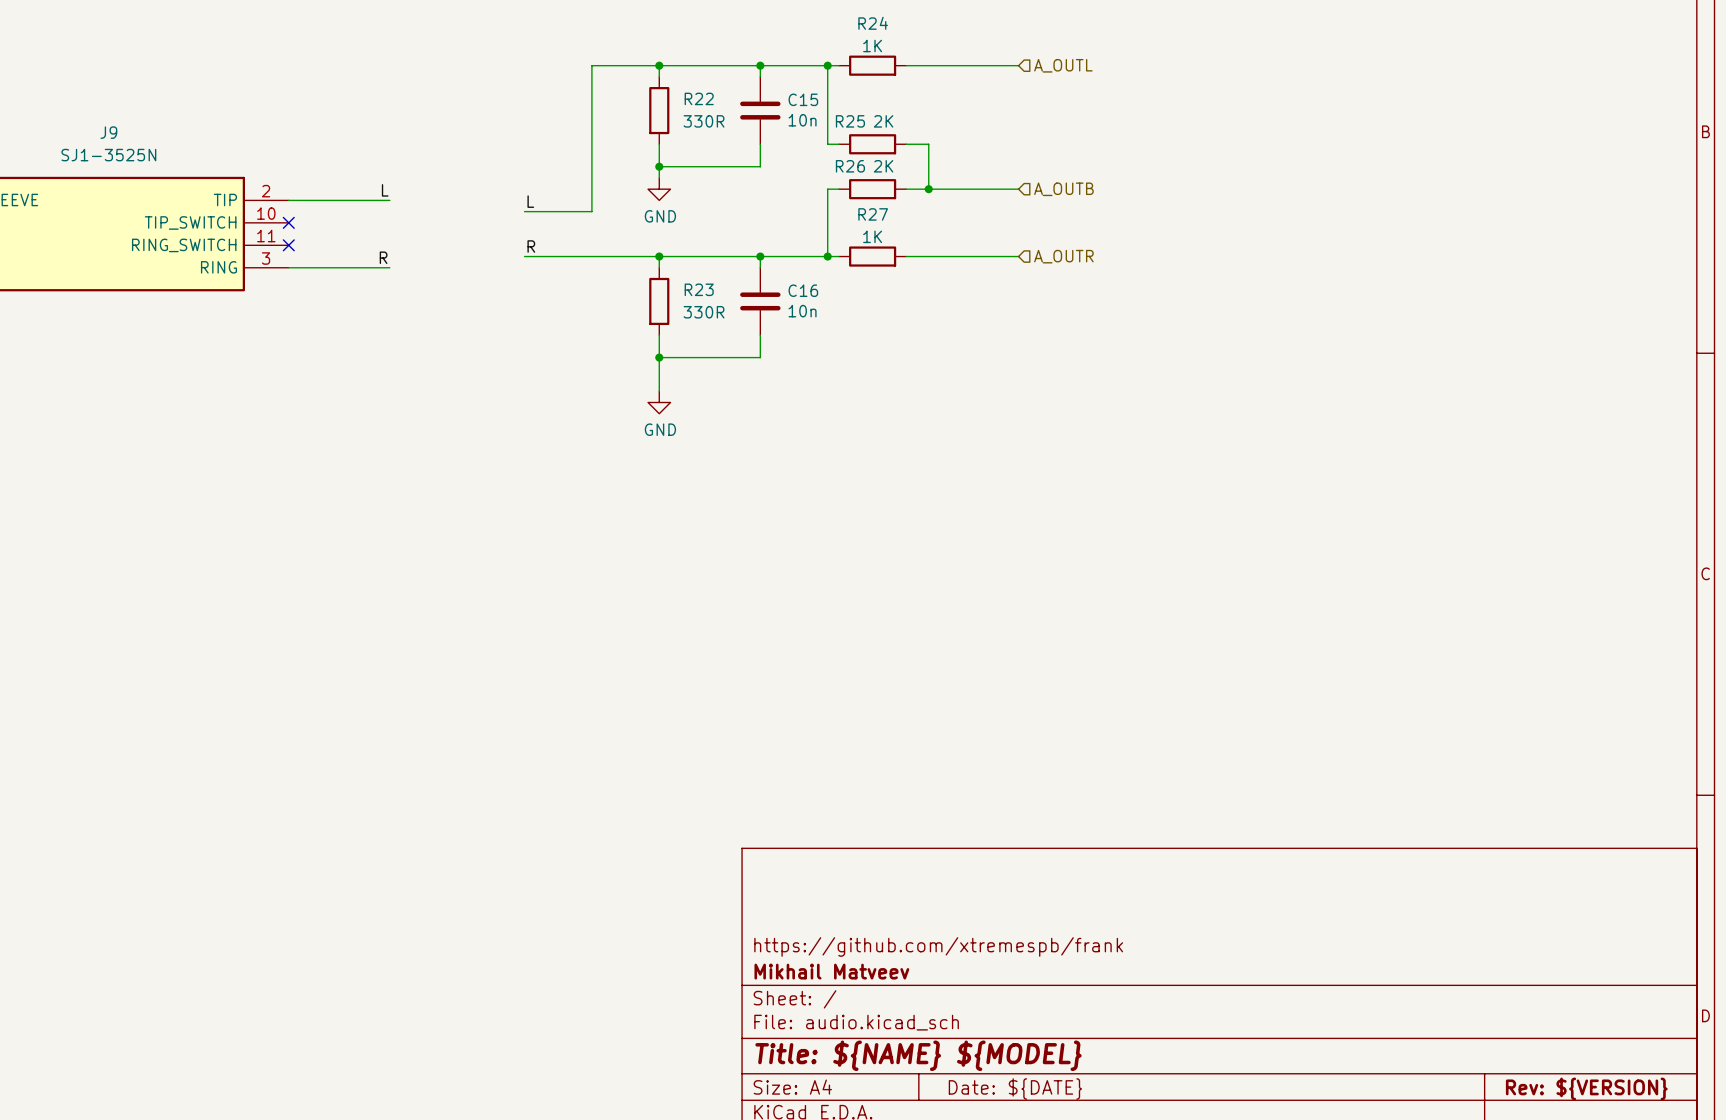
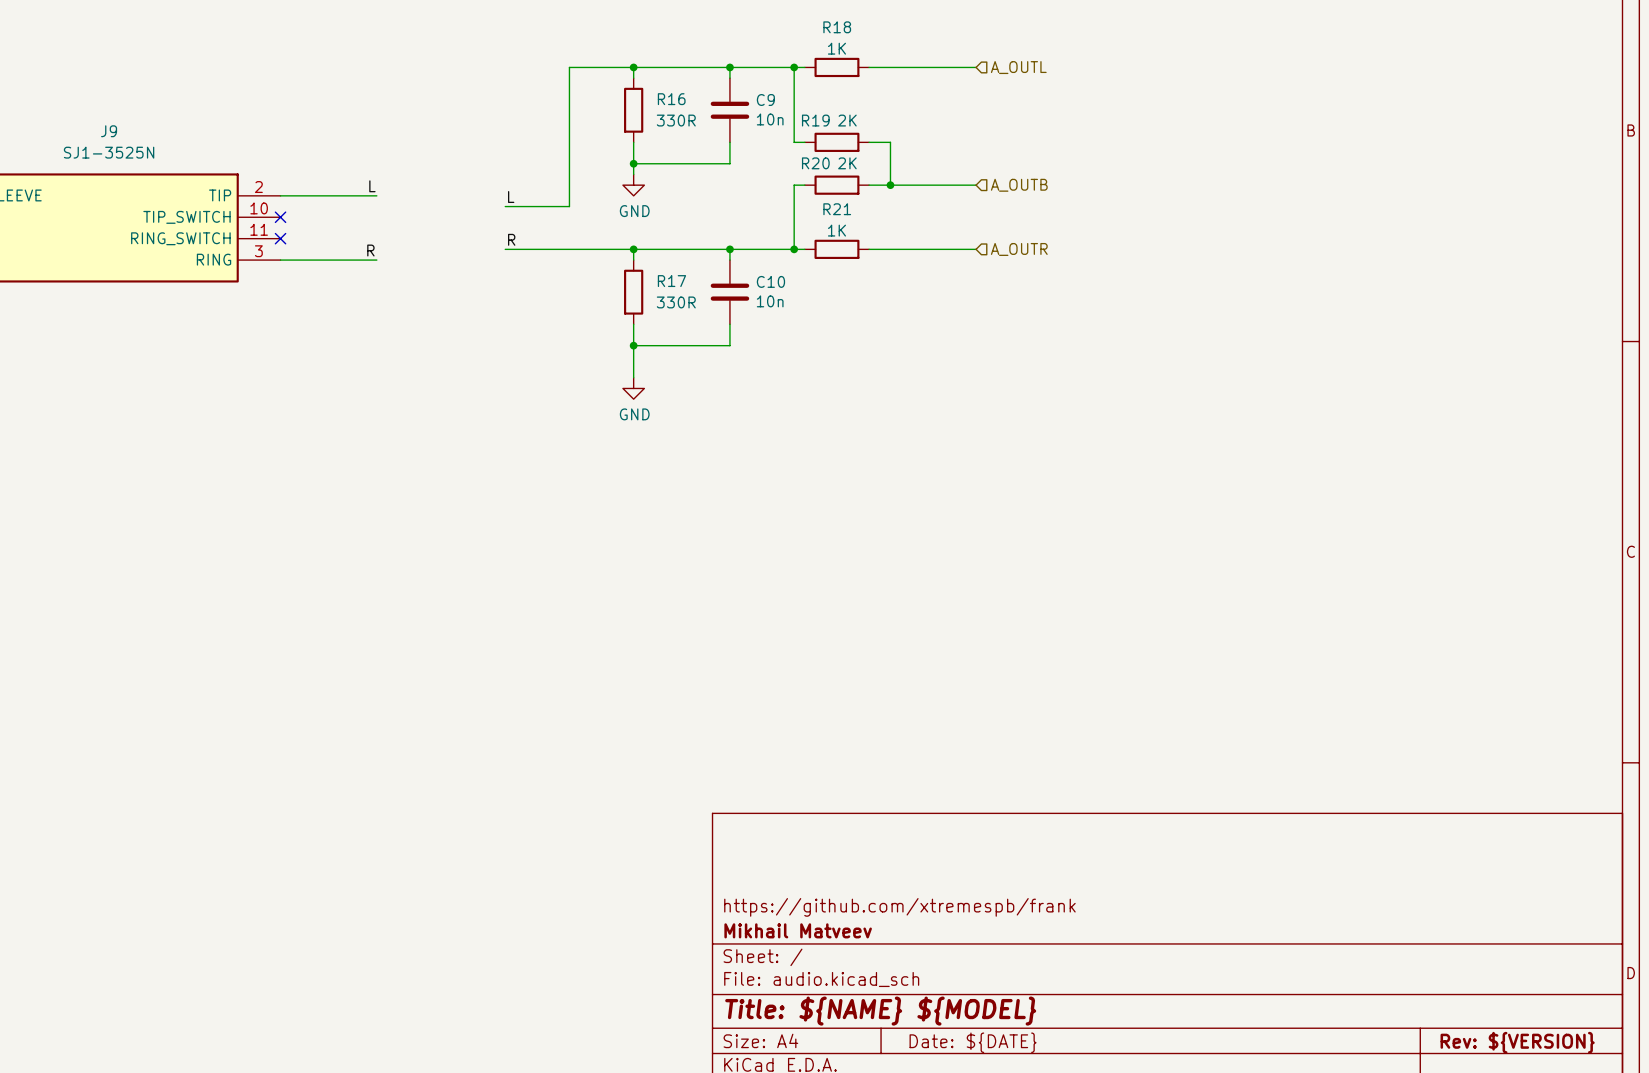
R24 name: R24 (873, 23) -> R18 (837, 27)
R22 name: R22 (699, 98) -> R16 (671, 99)
C15 name: C15 (803, 99) -> C9 (765, 100)
R25 name: R25 (850, 121) -> R19 (815, 120)
R26 name: R26 (850, 166) -> R20 (815, 163)
R27 name: R27 (873, 214) -> R21 (837, 209)
R23 name: R23 (699, 289) -> R17 (671, 281)
C16 name: C16 (803, 290) -> C10 (770, 281)

